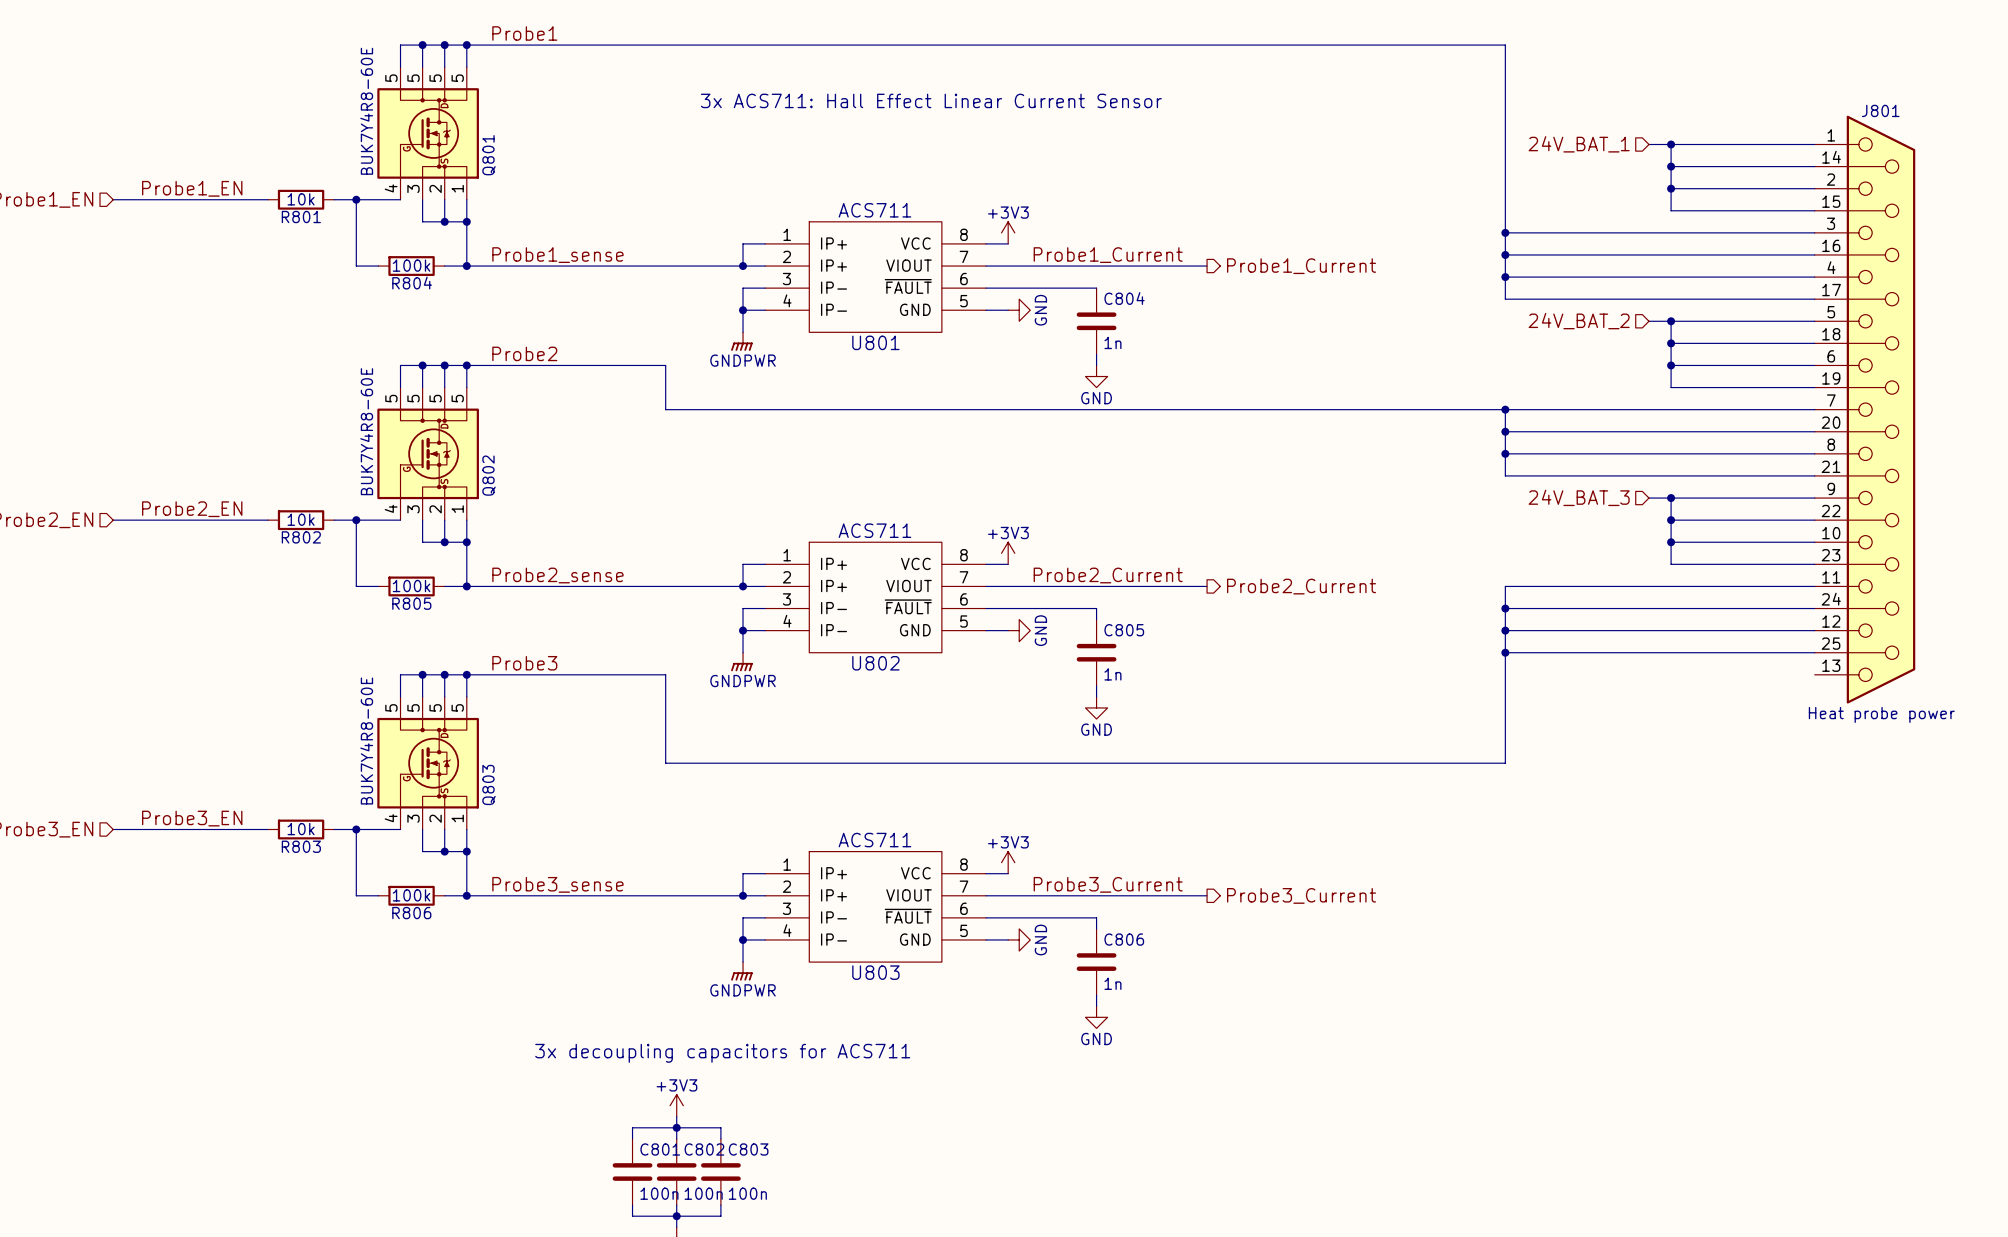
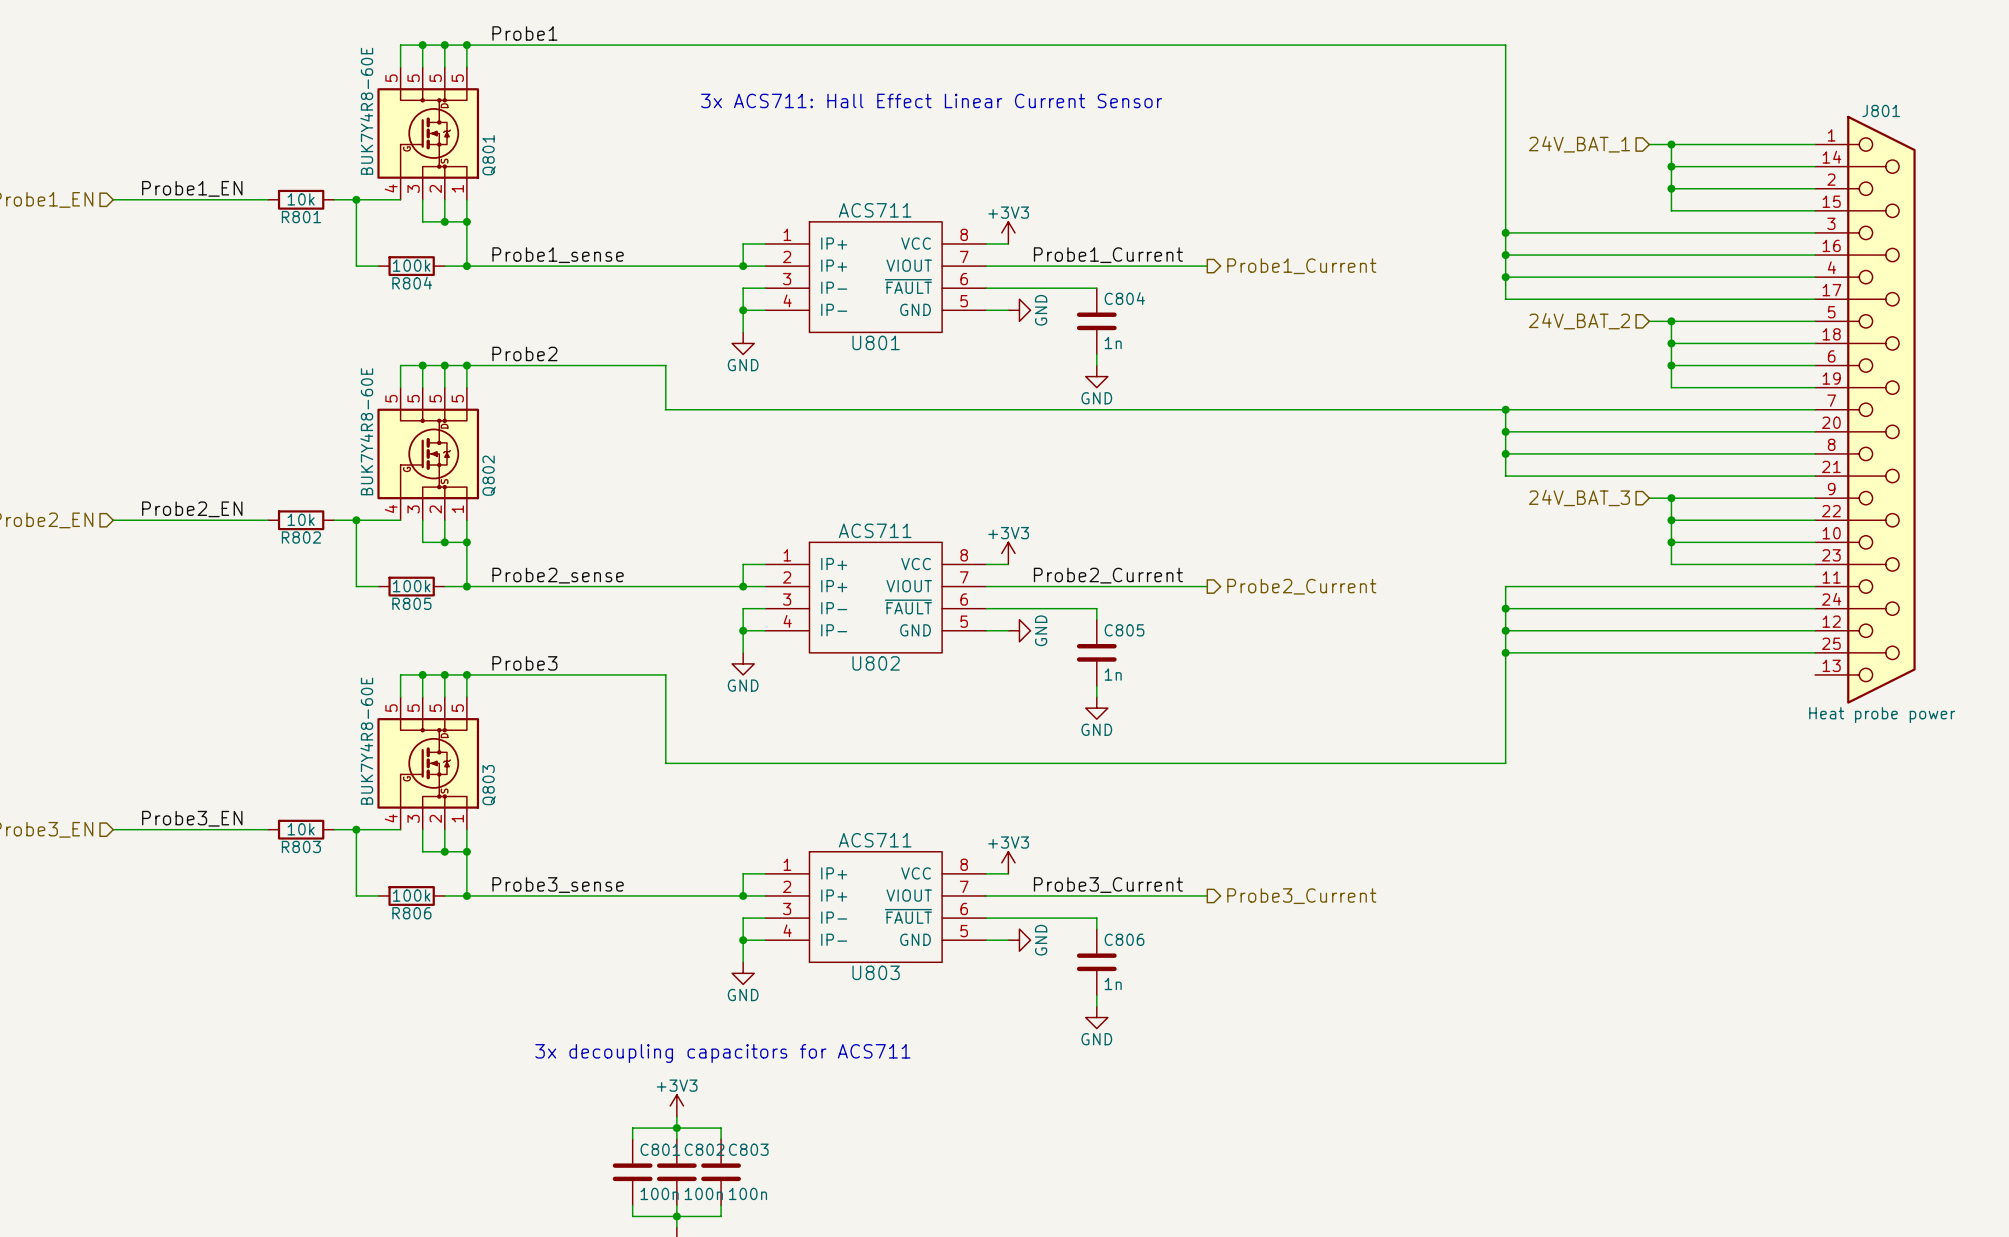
power symbol: GNDPWR (741, 341) -> GND (743, 343)
power symbol: GNDPWR (741, 662) -> GND (743, 663)
power symbol: GNDPWR (741, 971) -> GND (743, 973)

